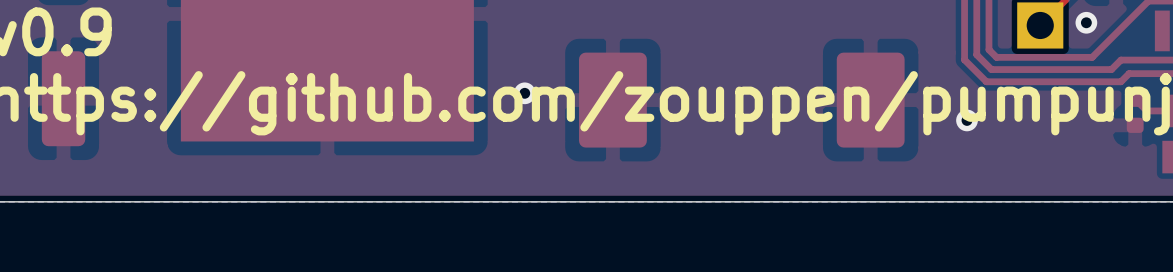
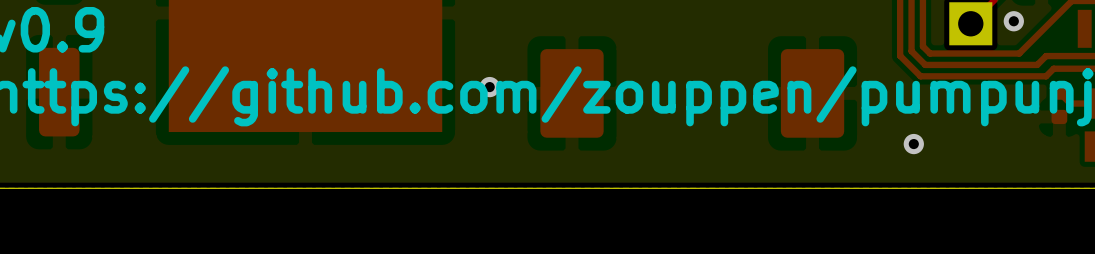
via position: (967, 120) -> (913, 144)

